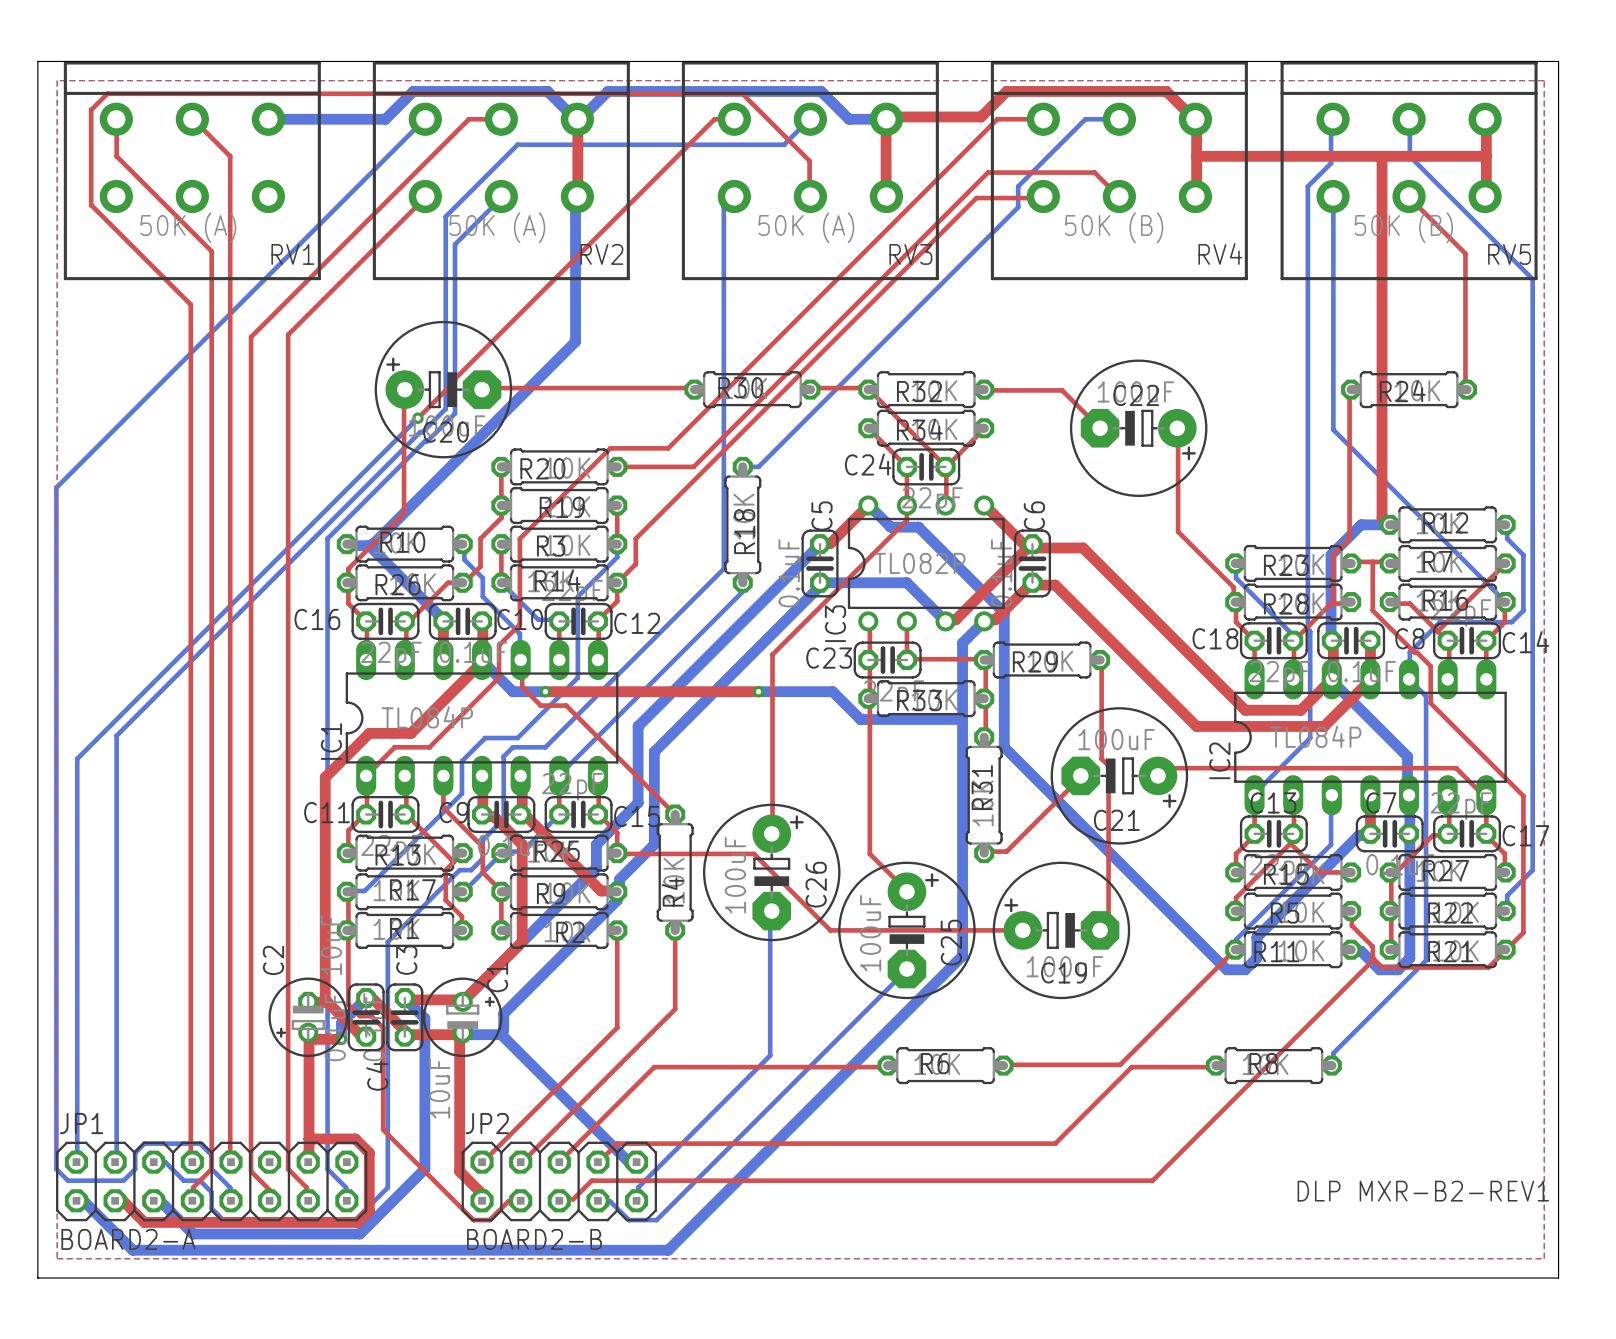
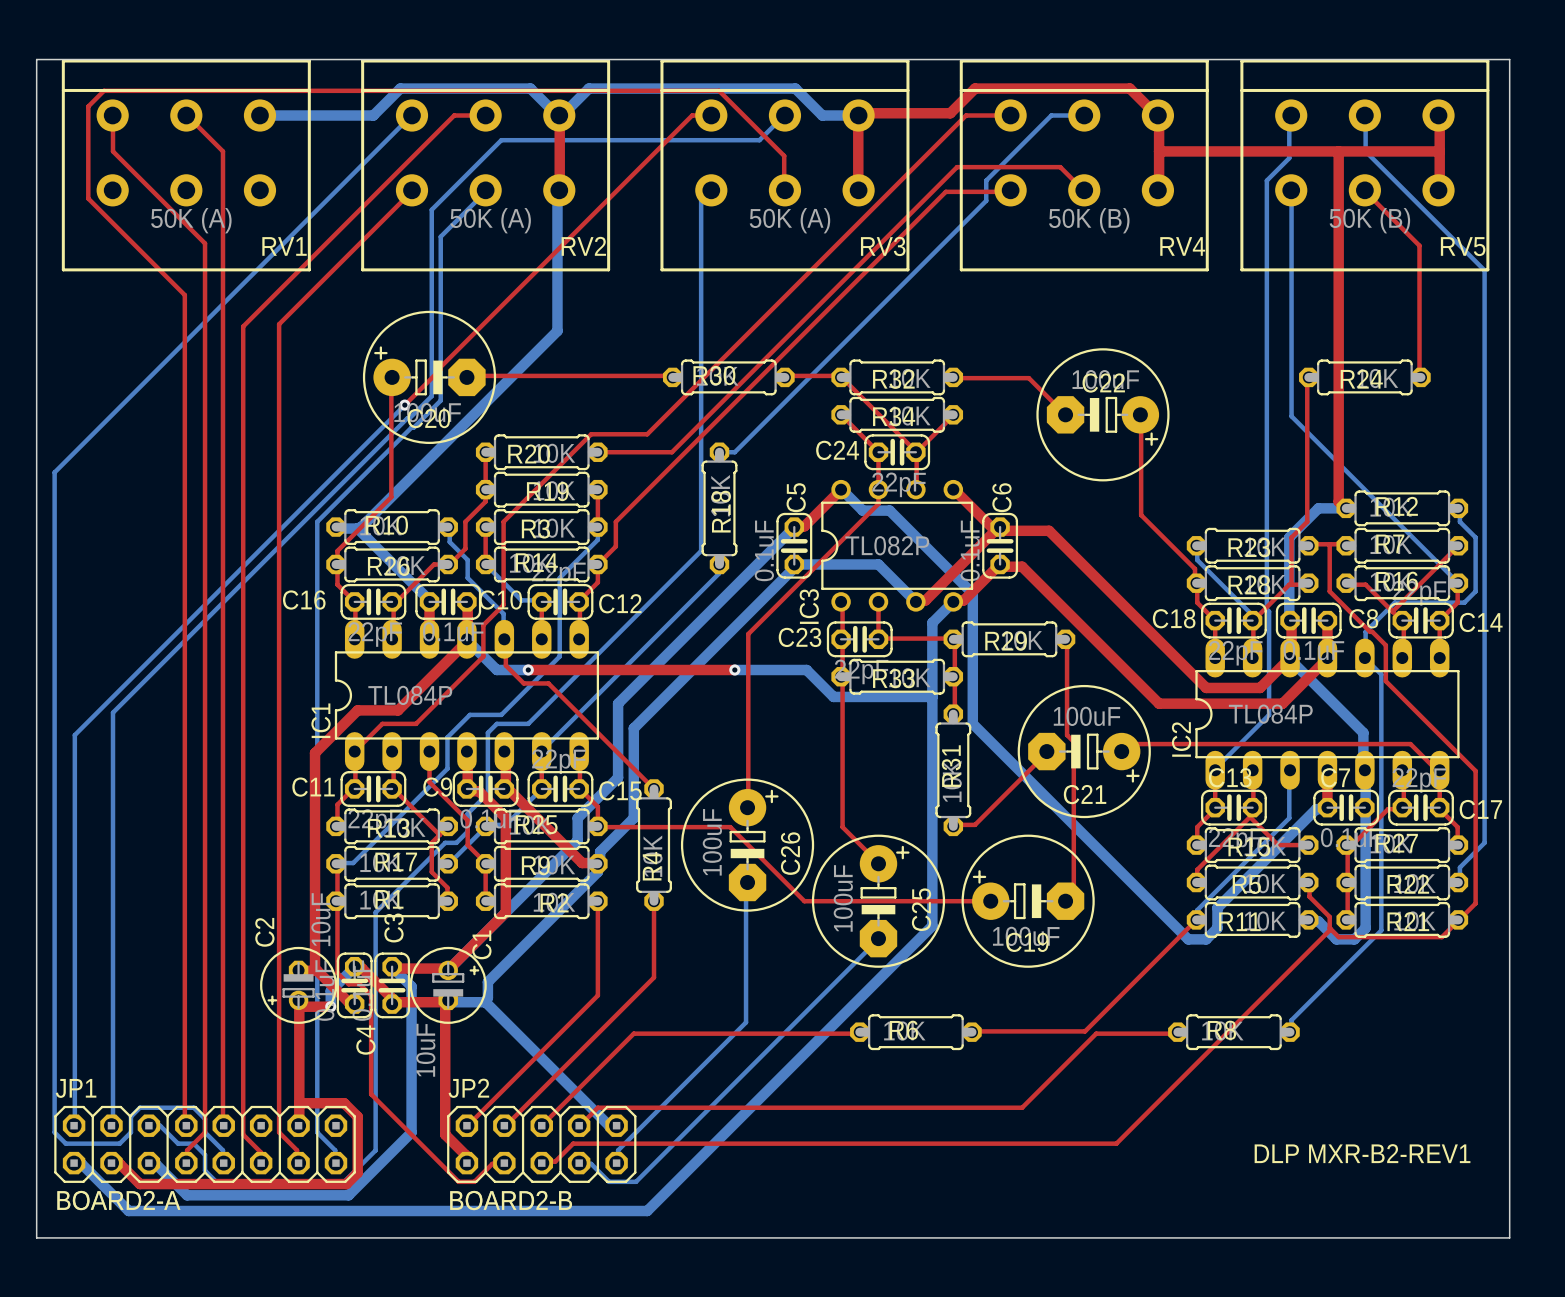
top zone outline: (57, 80) (1544, 80) (1544, 1258) (57, 1258) (57, 80) -> none

